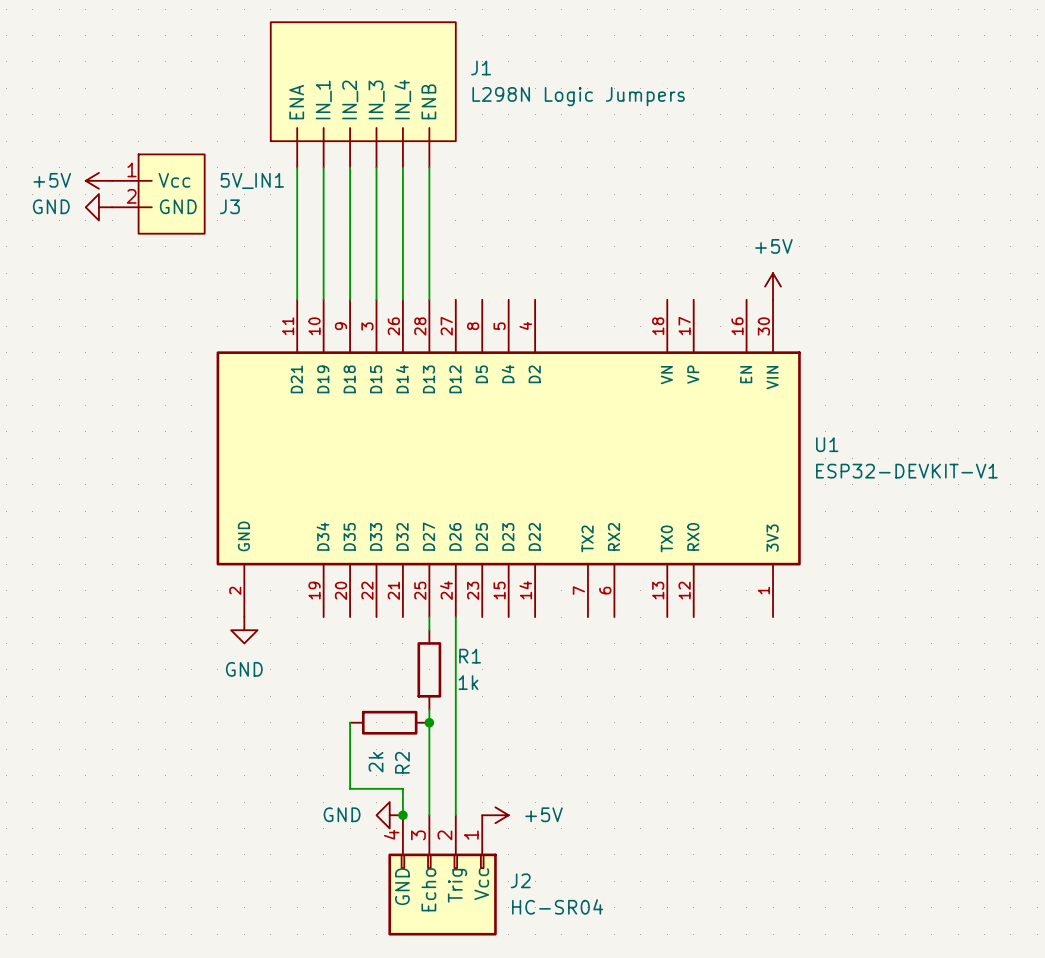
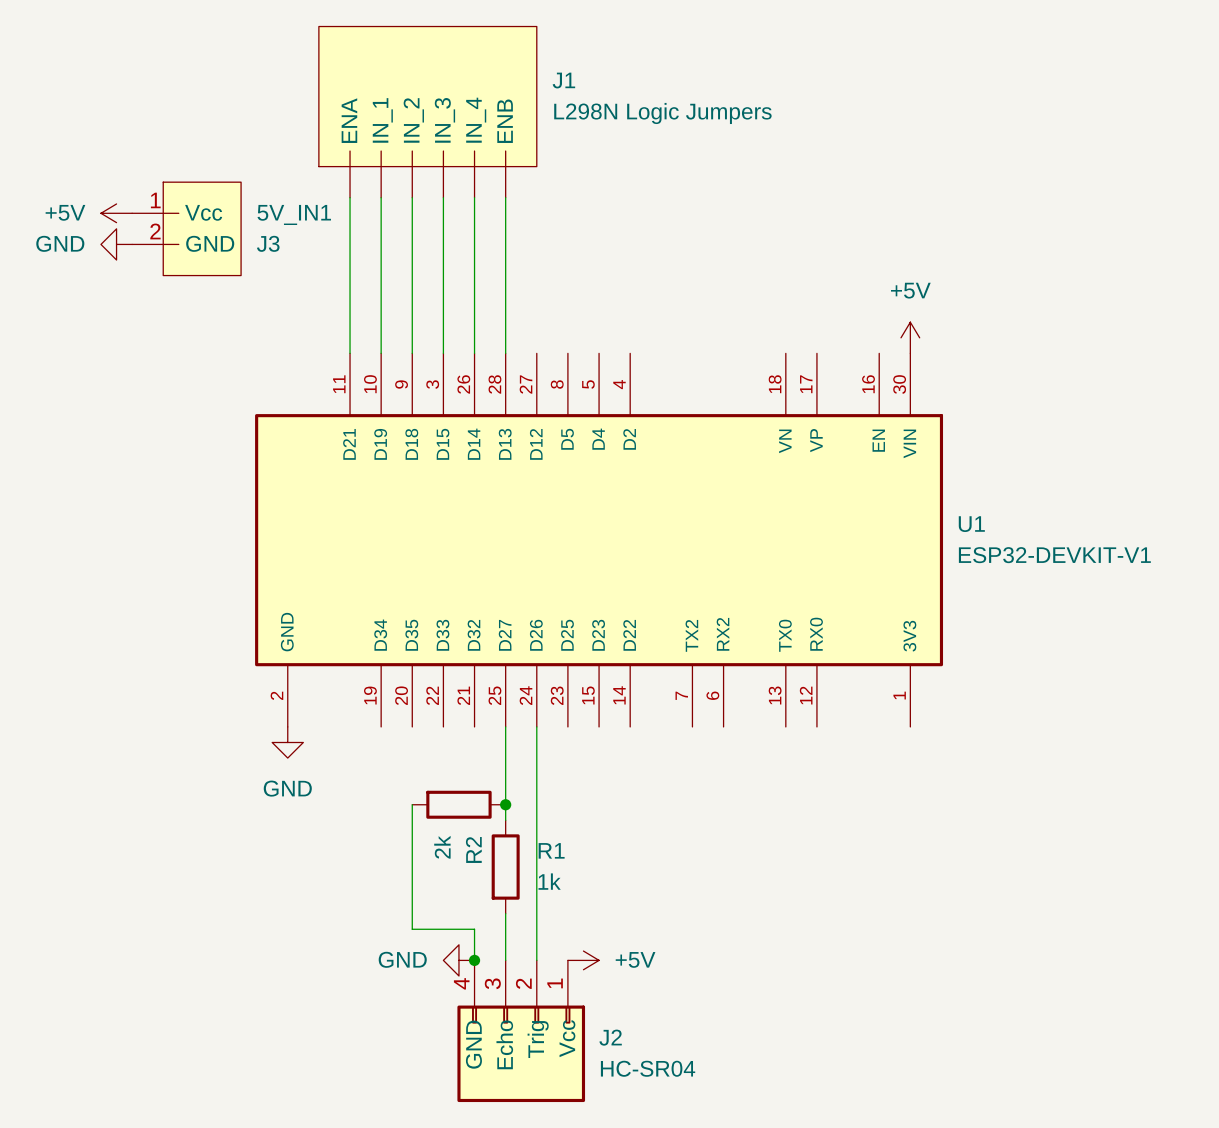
R1 position: (429, 669) -> (505, 867)
wire: none -> (412, 804) (412, 851)
wire: (429, 709) (429, 775) -> (505, 742) (505, 820)
R2 position: (389, 722) -> (458, 804)
junction position: (429, 722) -> (505, 804)

